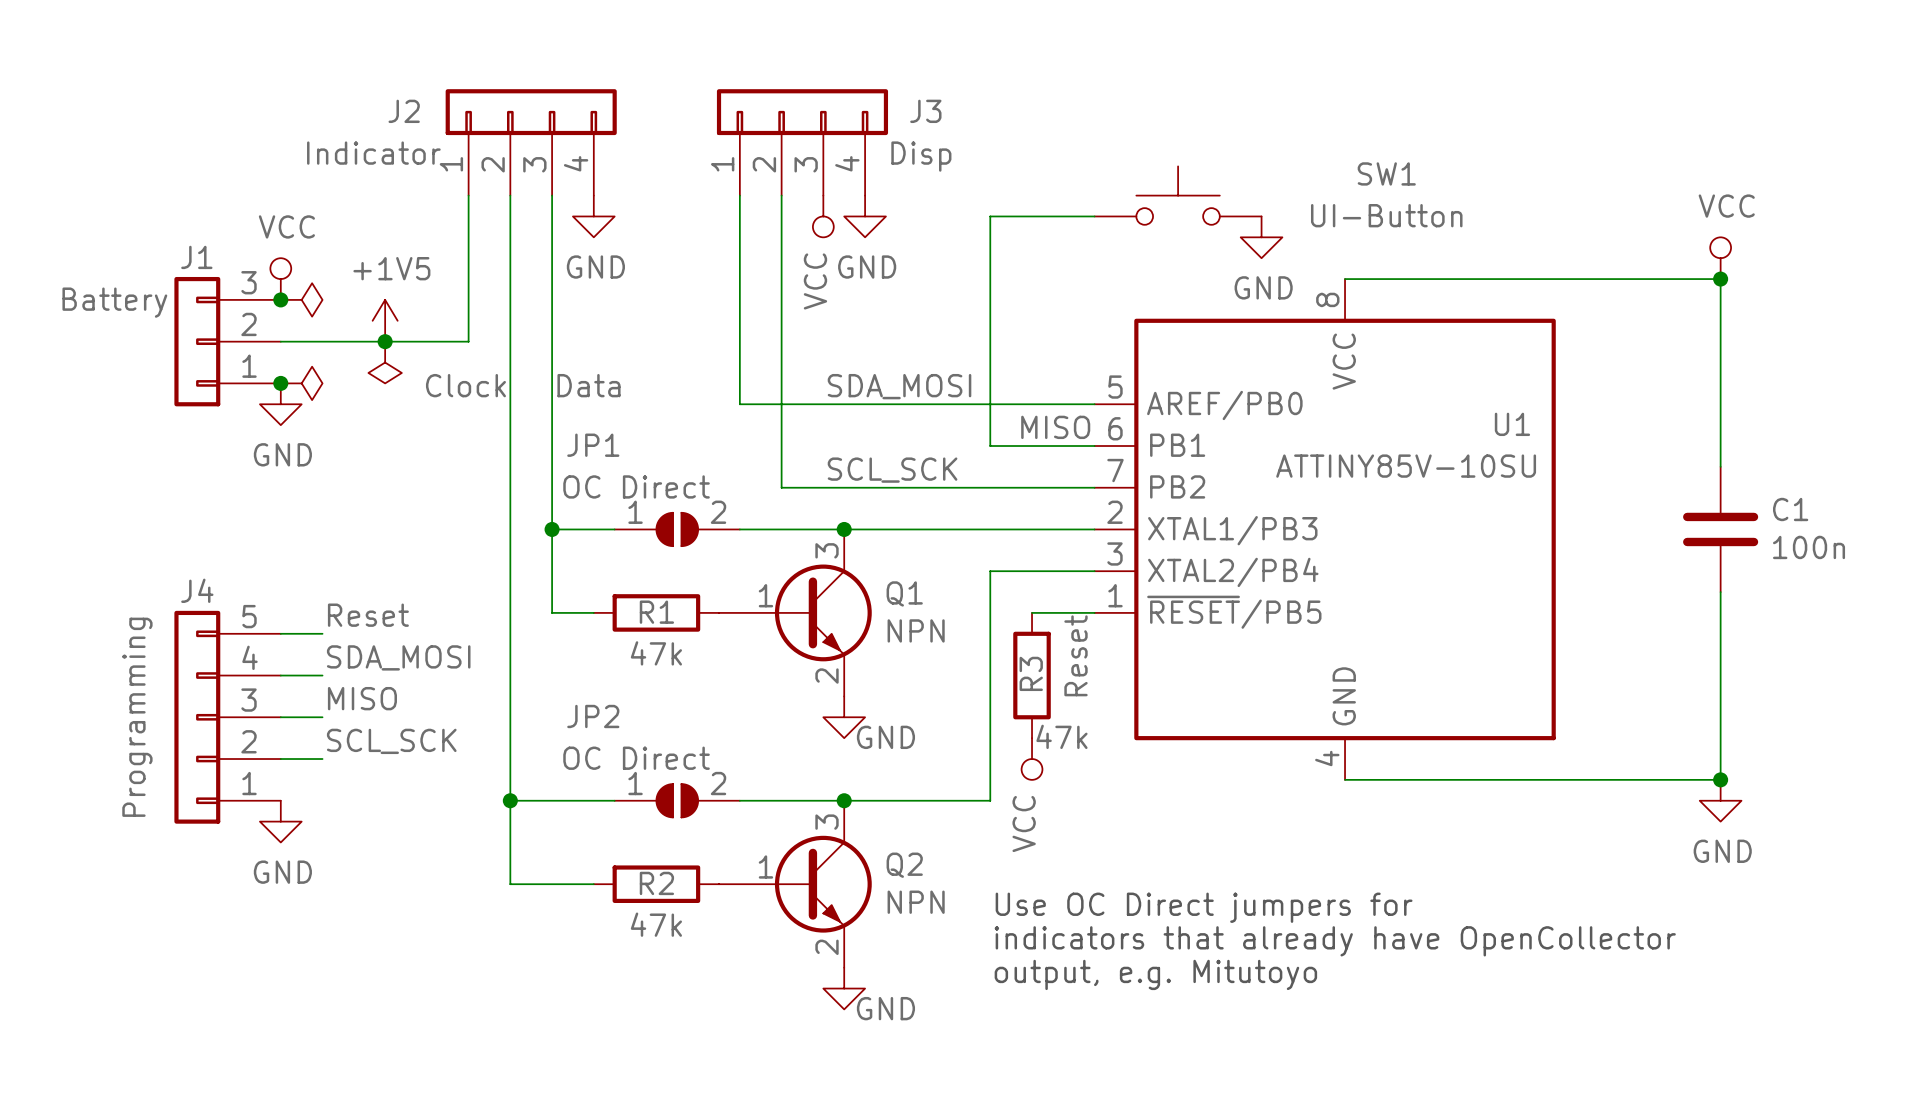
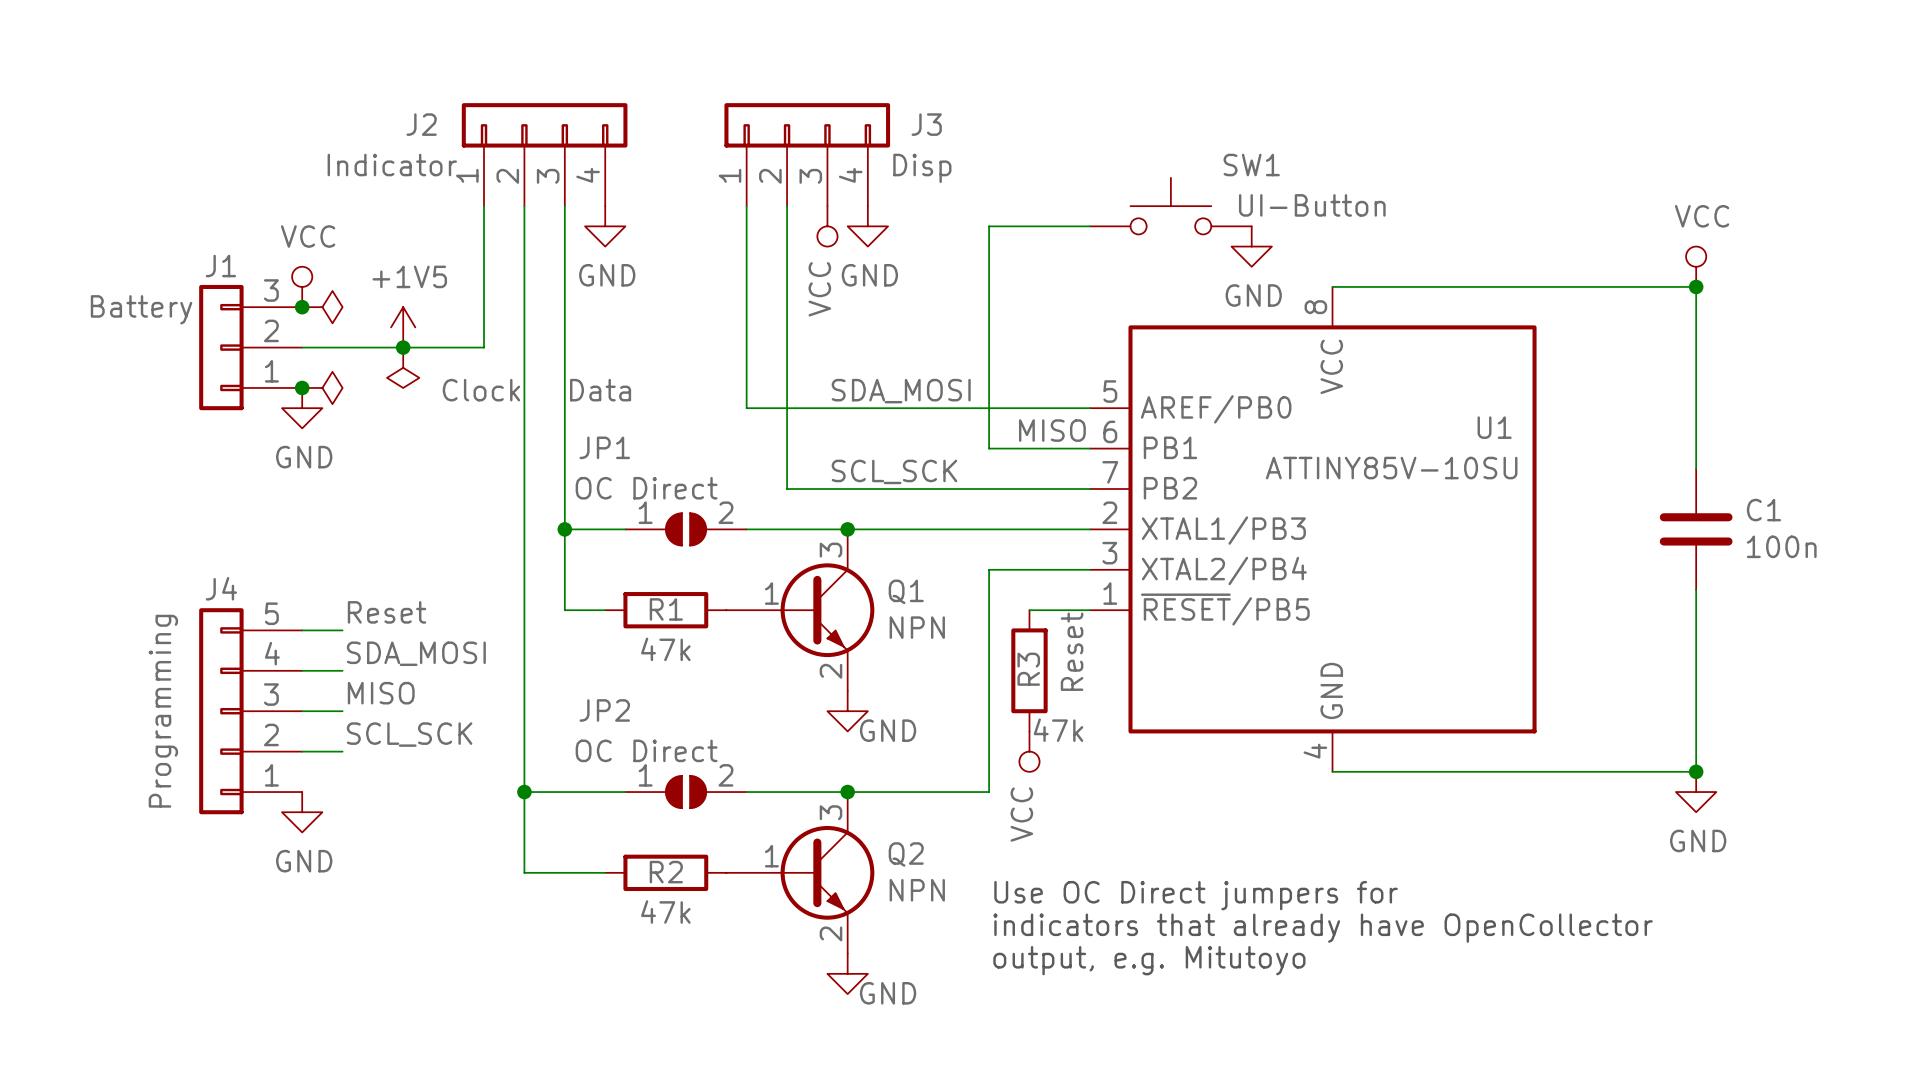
SW1 name position: SW1 (1386, 173) -> SW1 (1251, 165)
SW1 value position: UI-Button (1386, 215) -> UI-Button (1312, 205)

